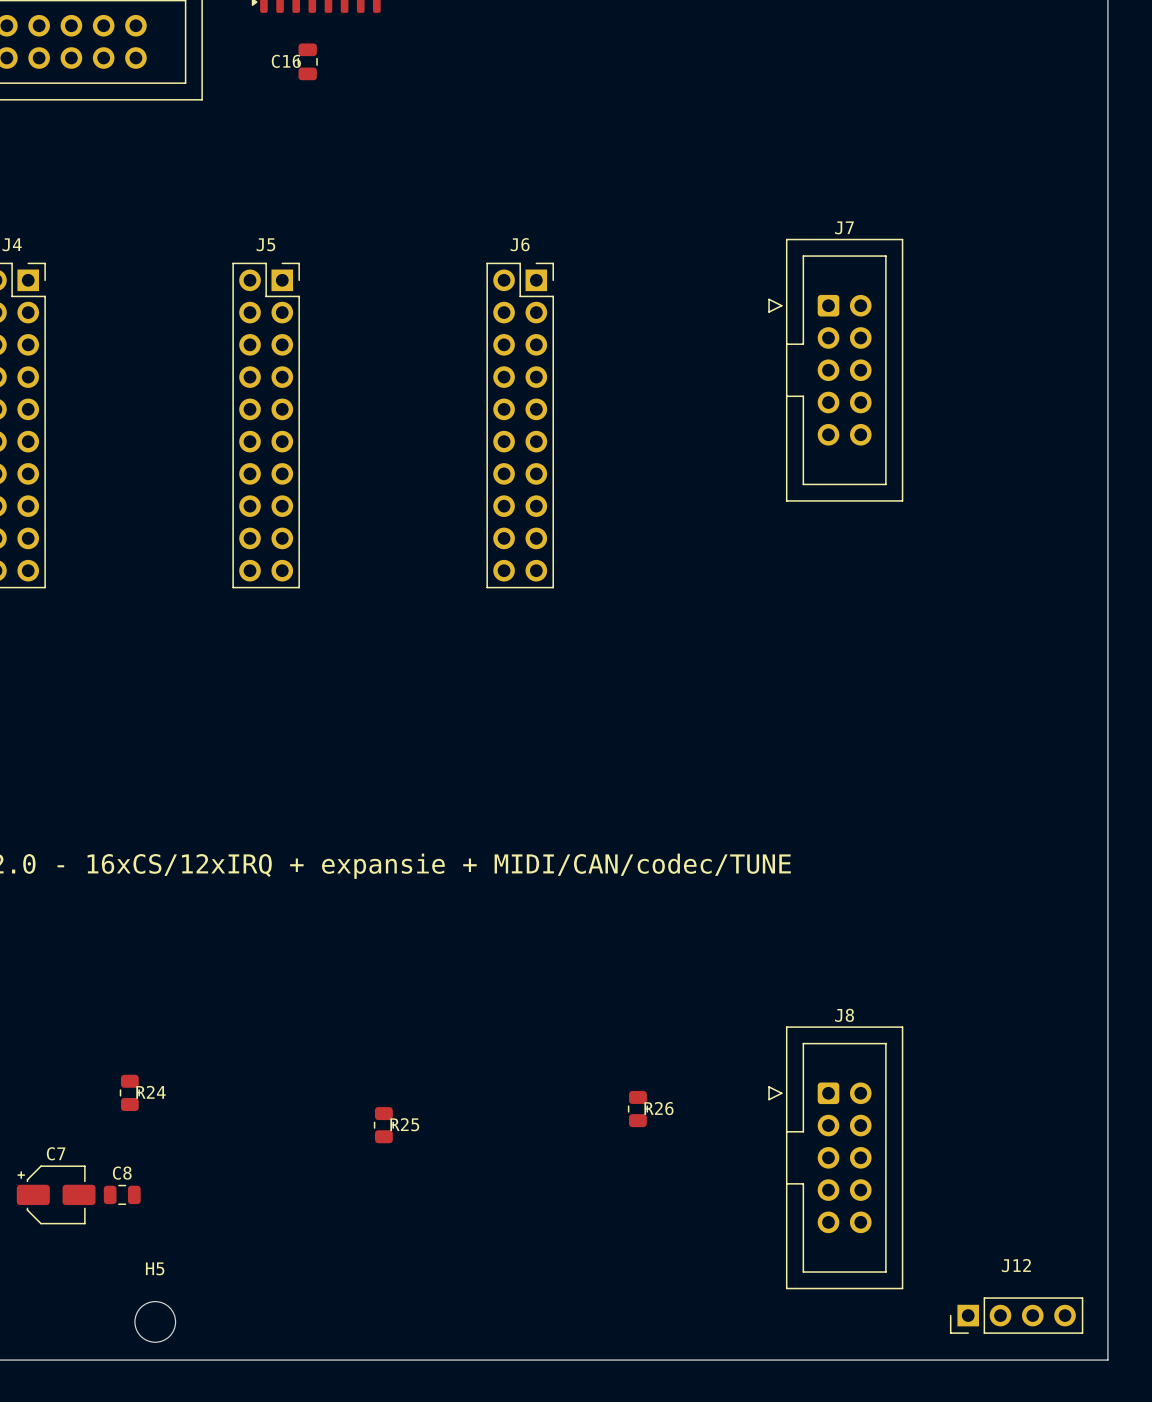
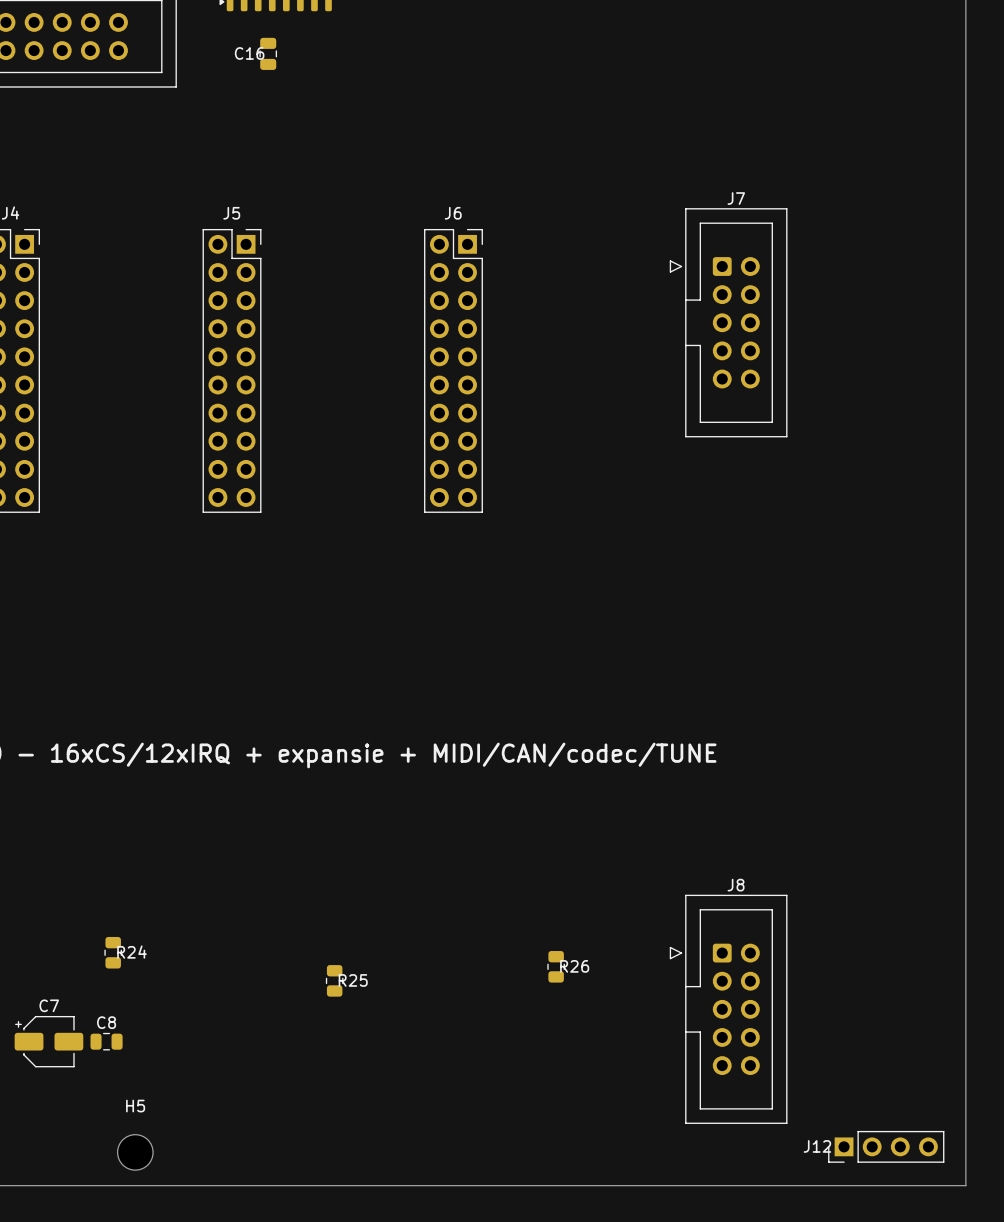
J12 name position: J12 (1016, 1265) -> J12 (817, 1146)

